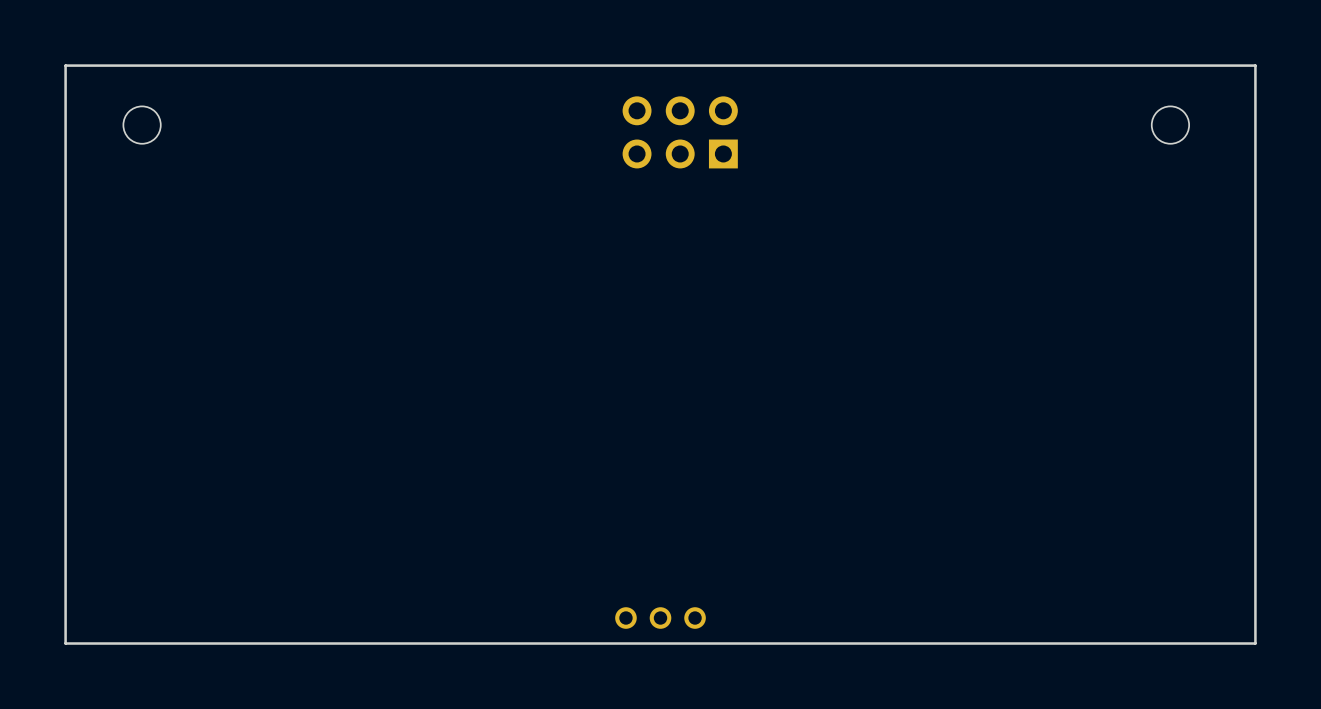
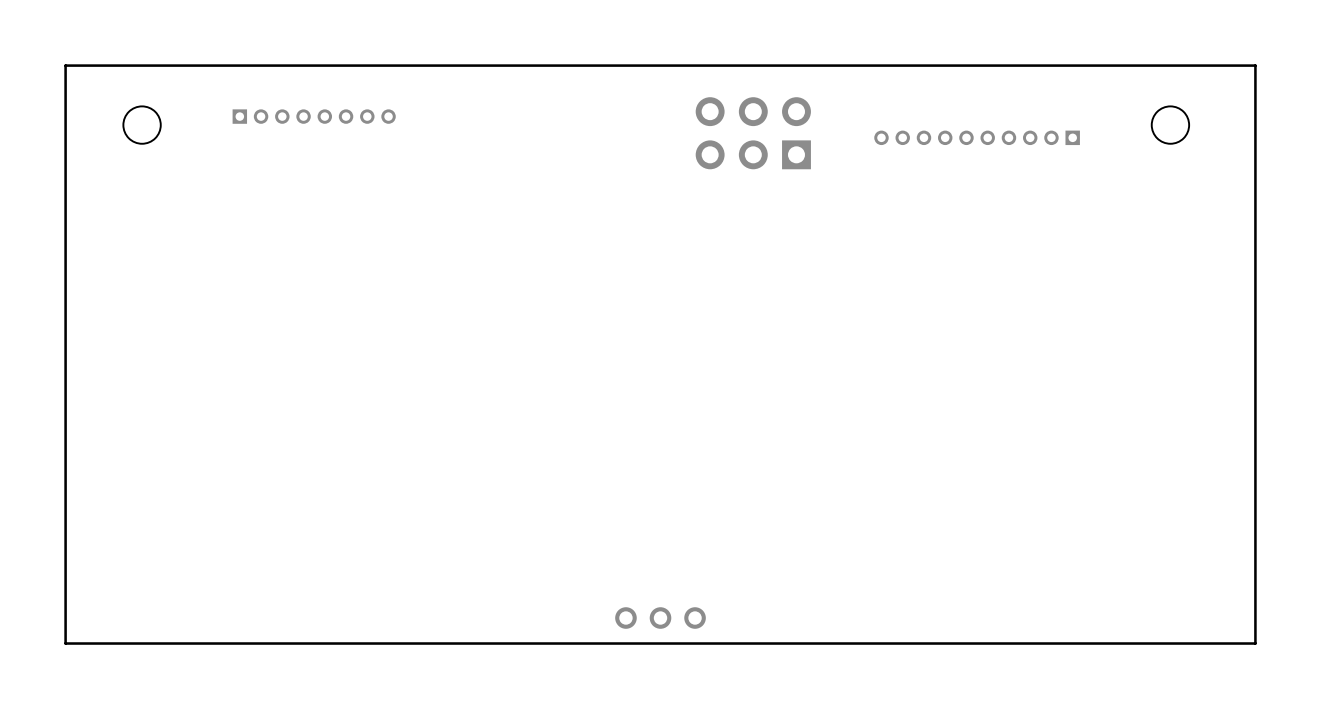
part: none -> (314, 116)
part position: (680, 132) -> (753, 133)
part: none -> (977, 137)

